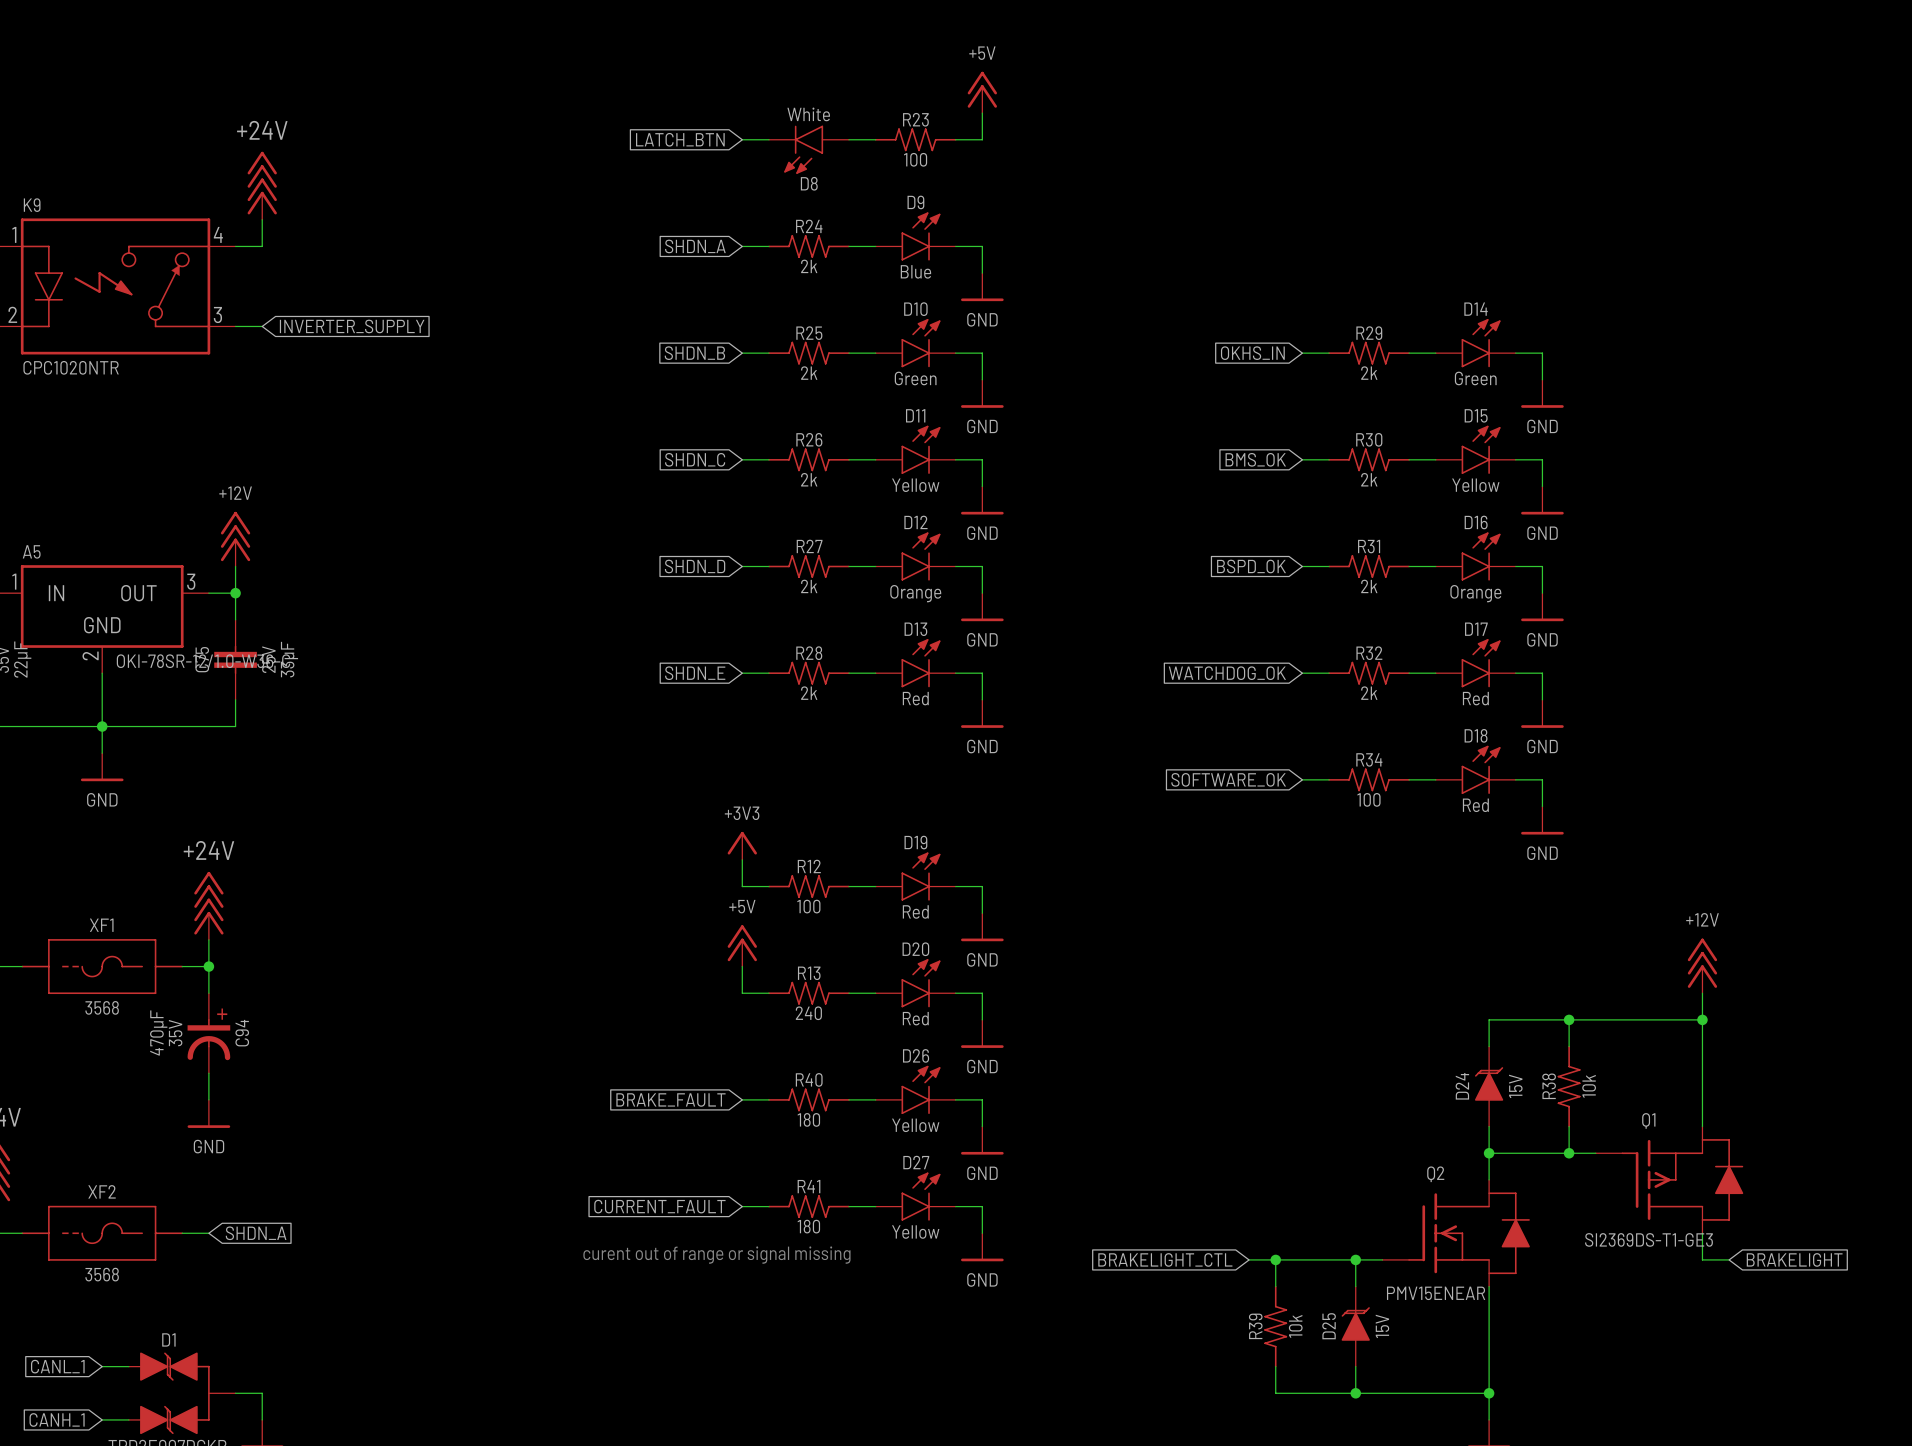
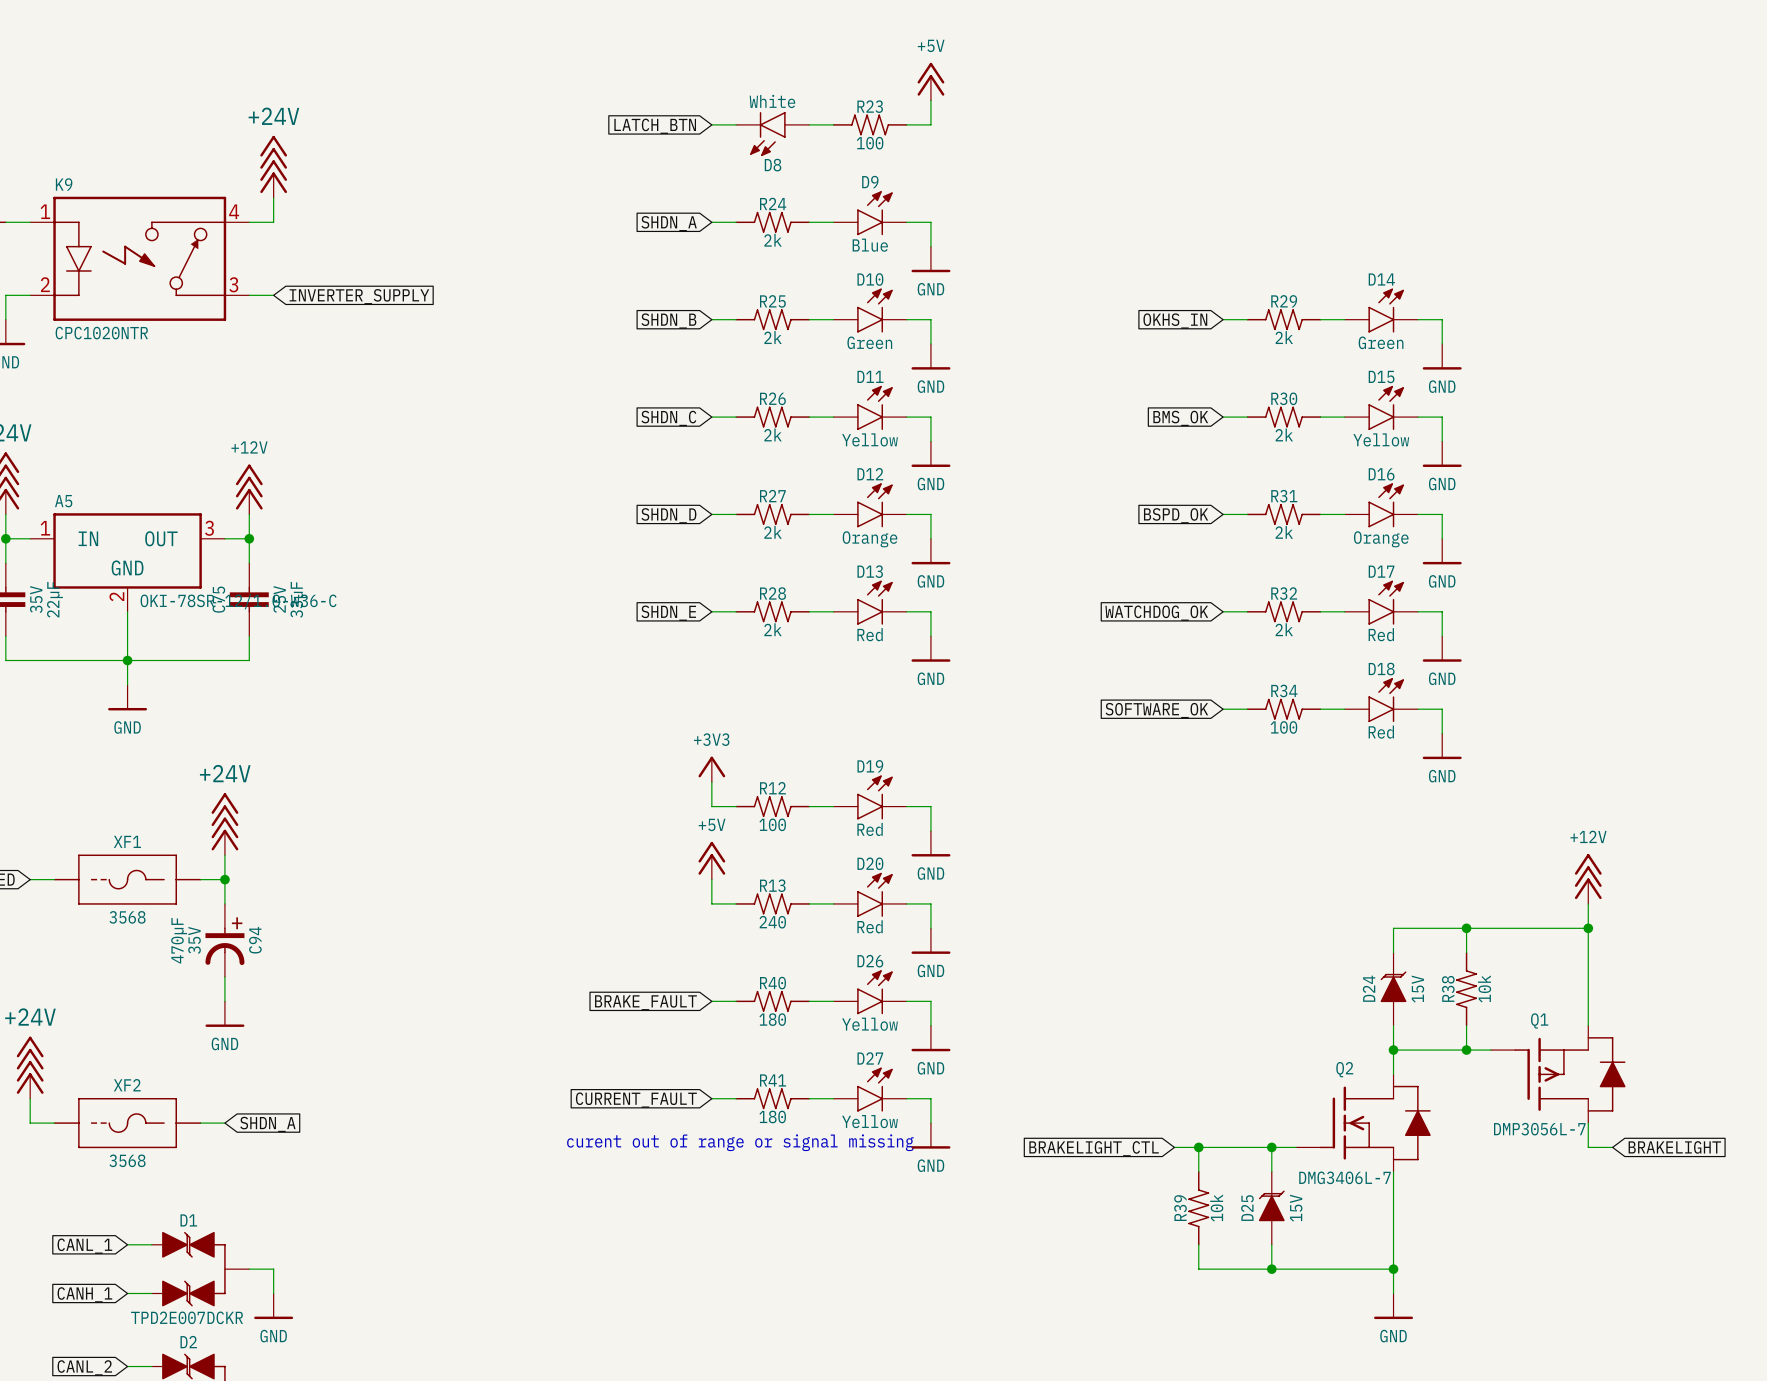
Q1 text: SI2369DS-T1-GE3 (1649, 1239) -> DMP3056L-7 (1539, 1129)
Q2 text: PMV15ENEAR (1436, 1293) -> DMG3406L-7 (1345, 1177)

